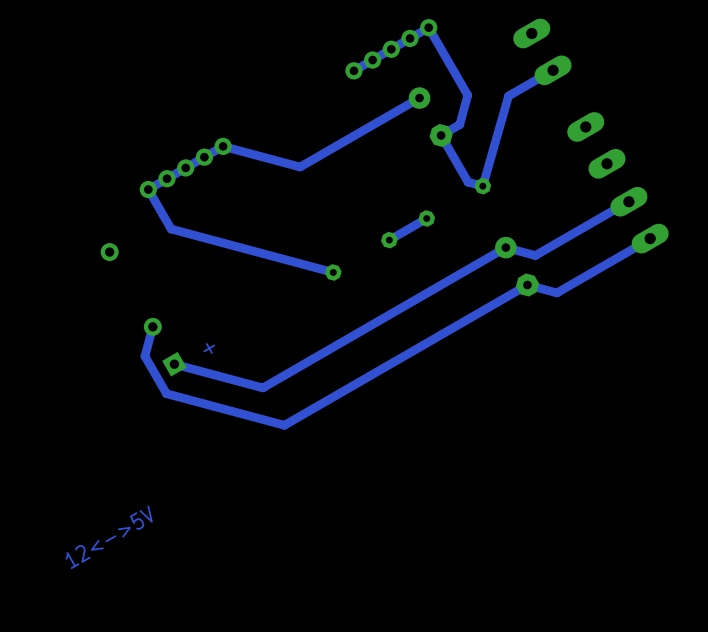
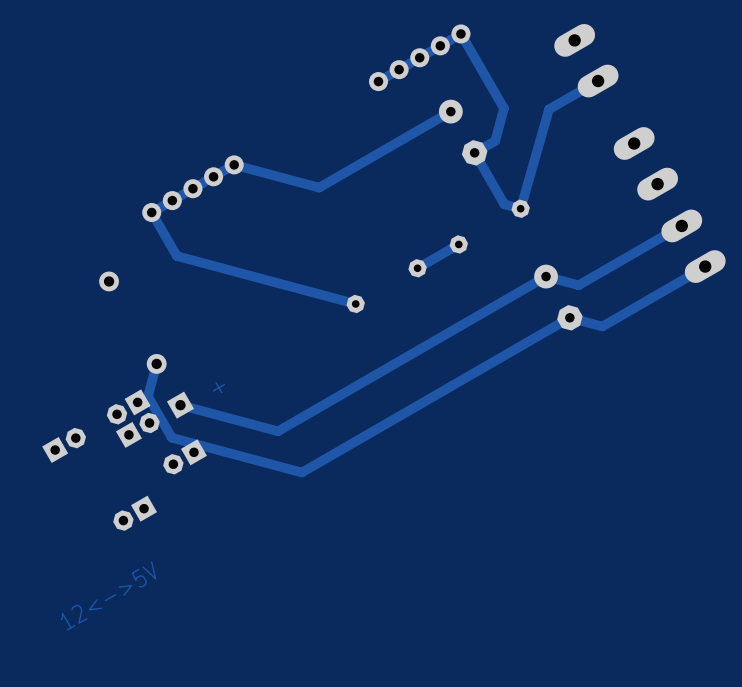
part: none -> (128, 406)
part: none -> (137, 430)
part: none -> (64, 445)
part: none -> (185, 456)
part: none -> (135, 513)

